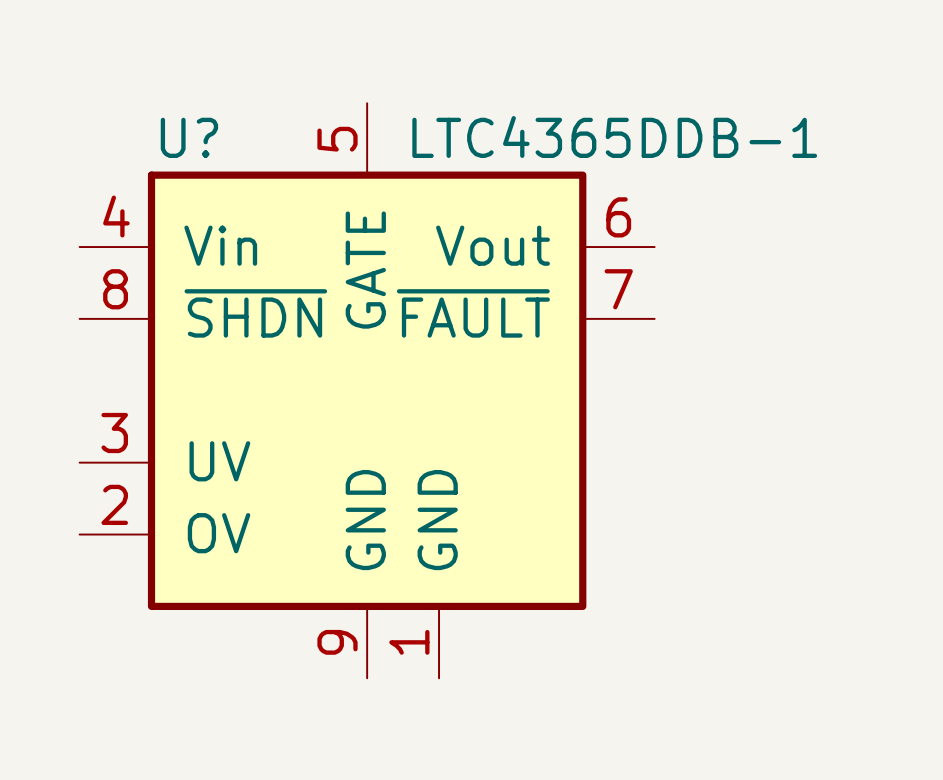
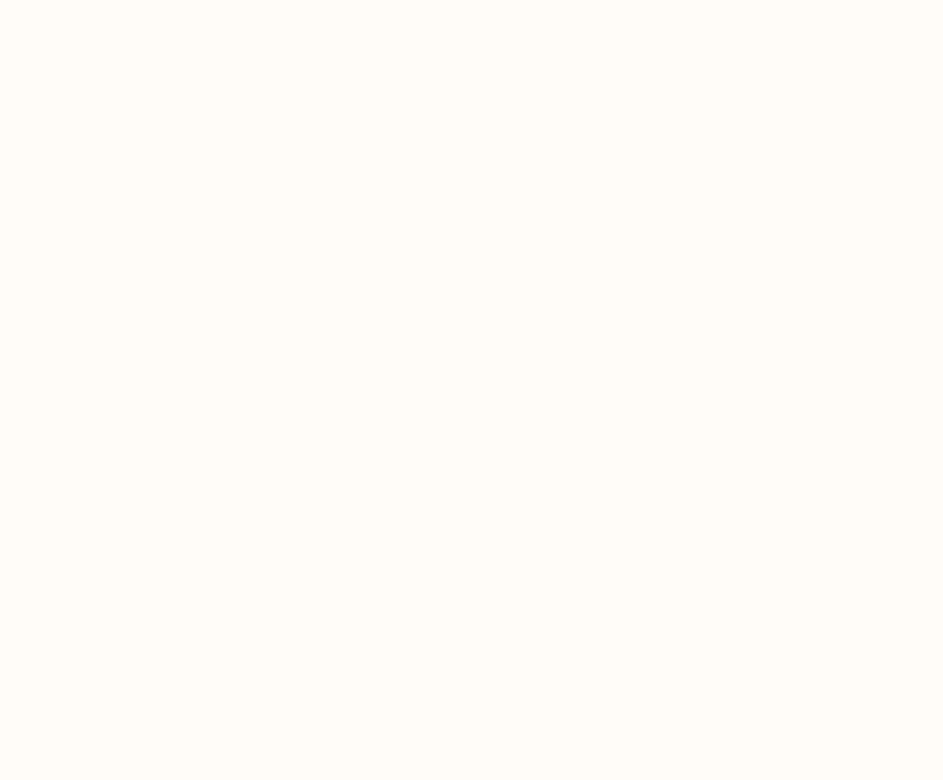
U?: LTC4365DDB-1 (367, 390) -> none

